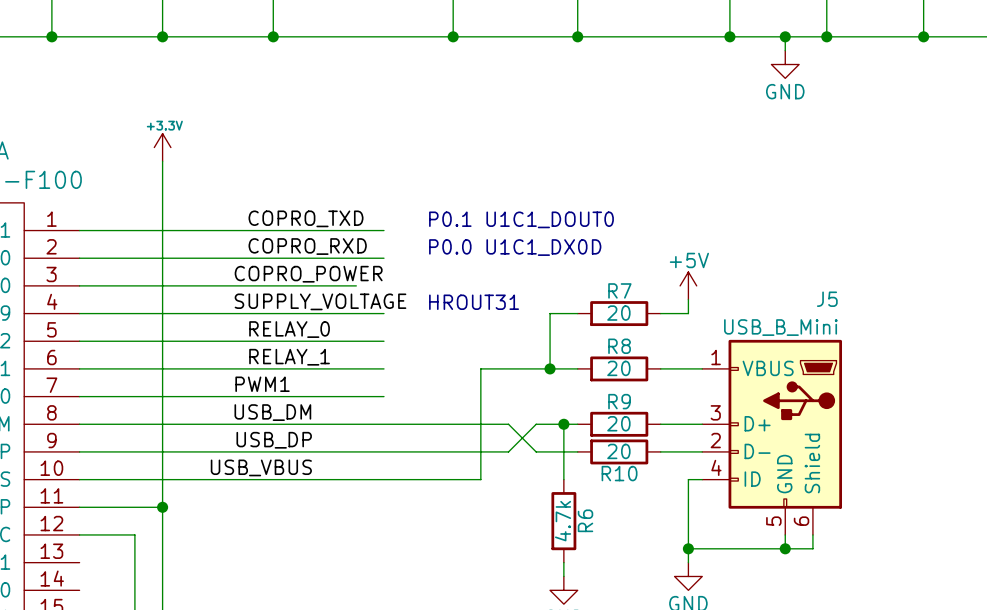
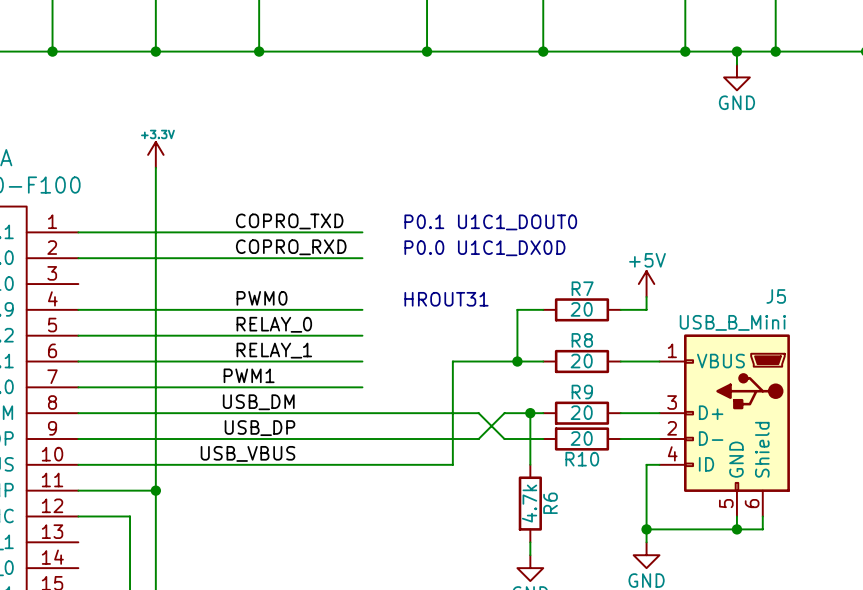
label: COPRO_POWER (308, 274) -> none
wire: (79, 285) (356, 285) -> none
label: none -> PWM0 (262, 298)
label: SUPPLY_VOLTAGE (320, 301) -> none

